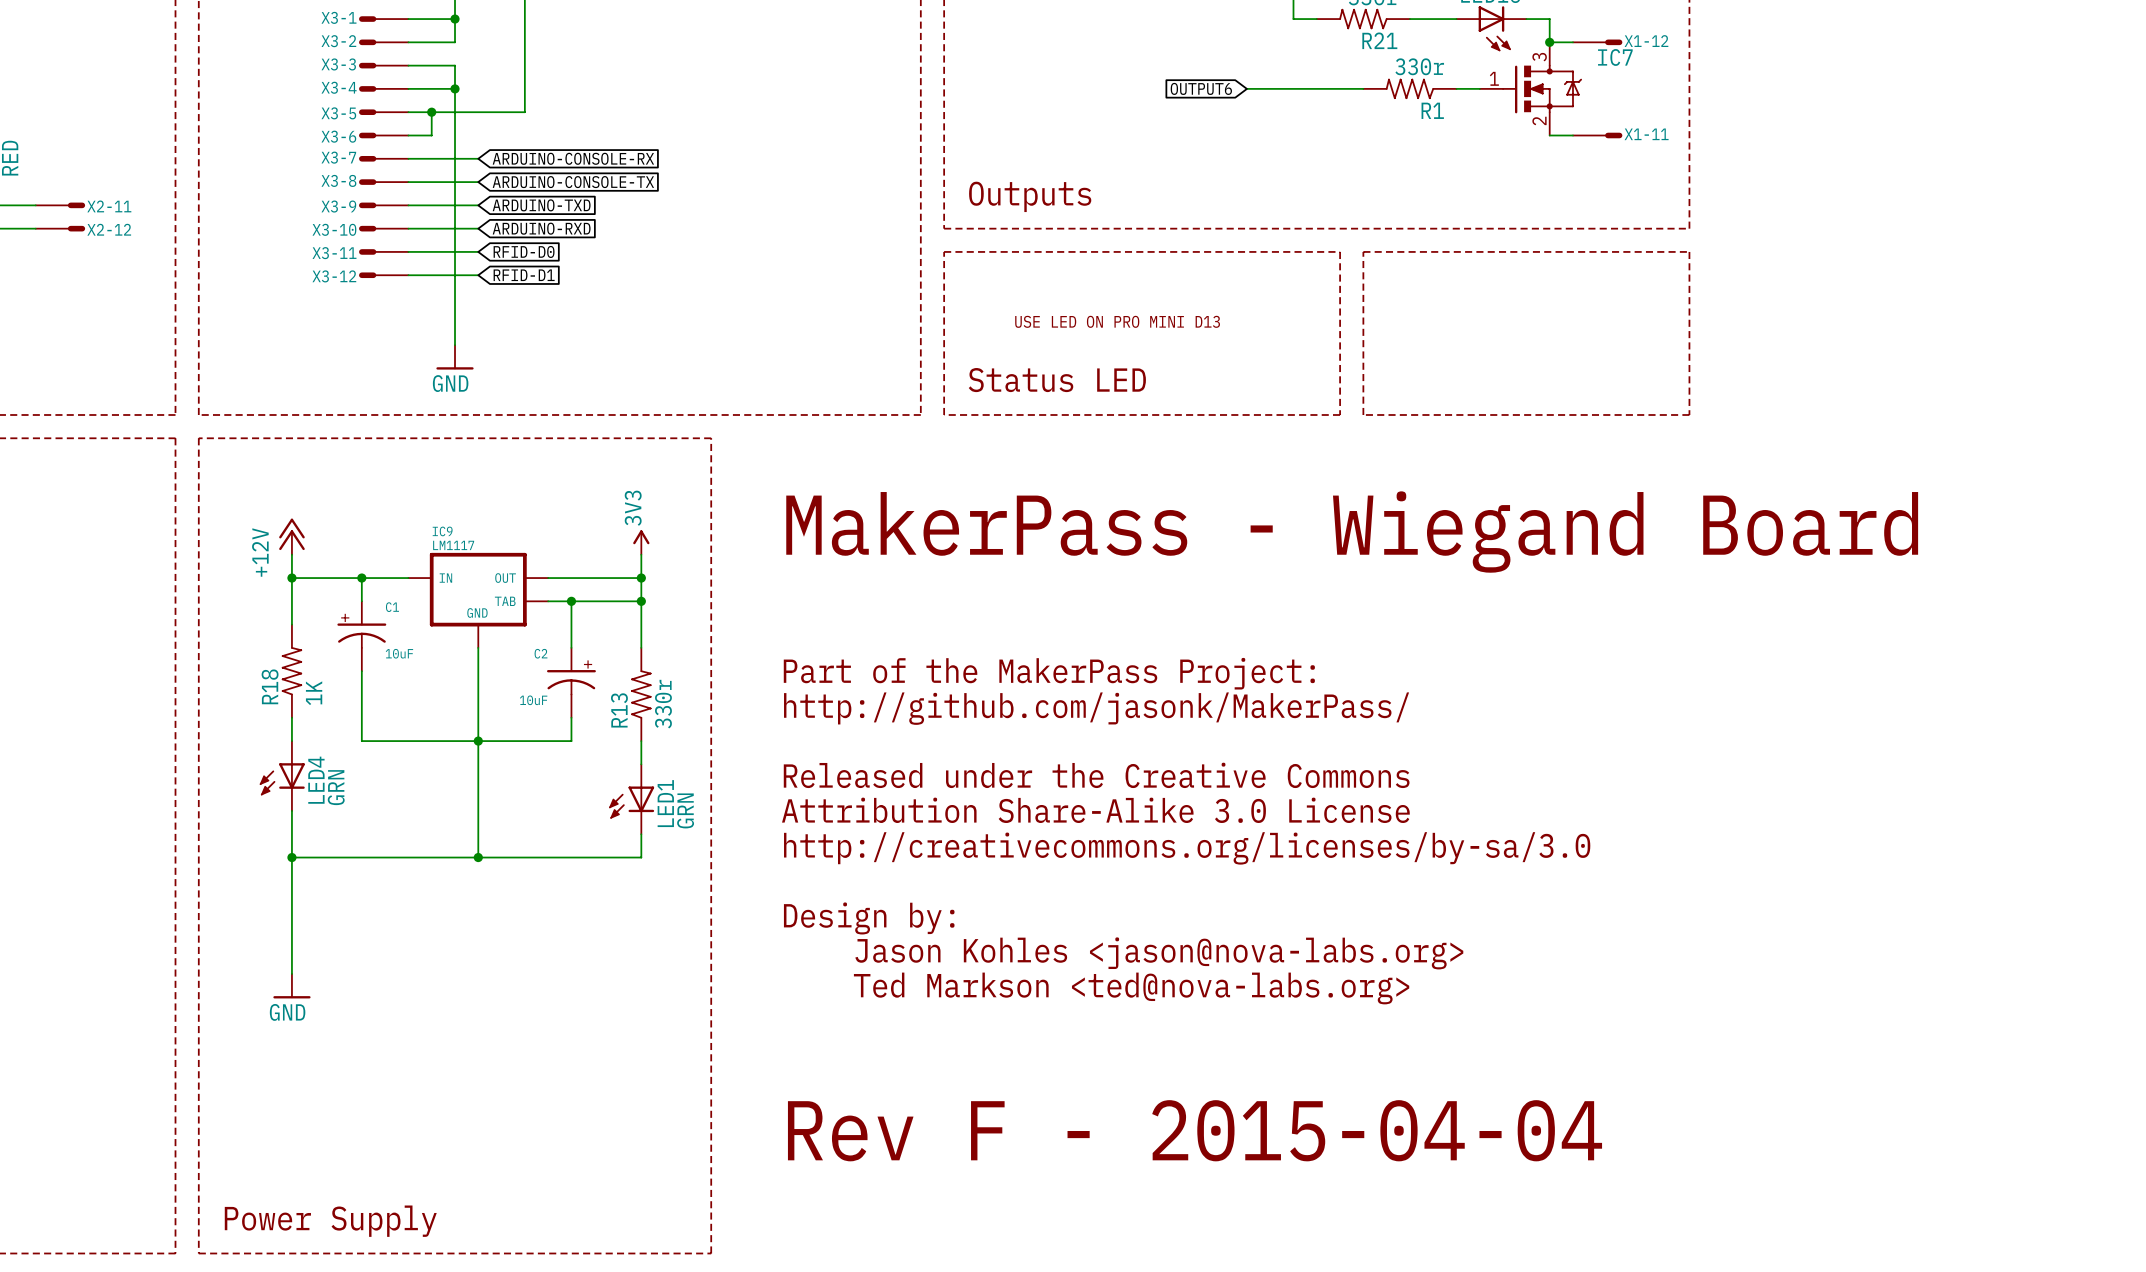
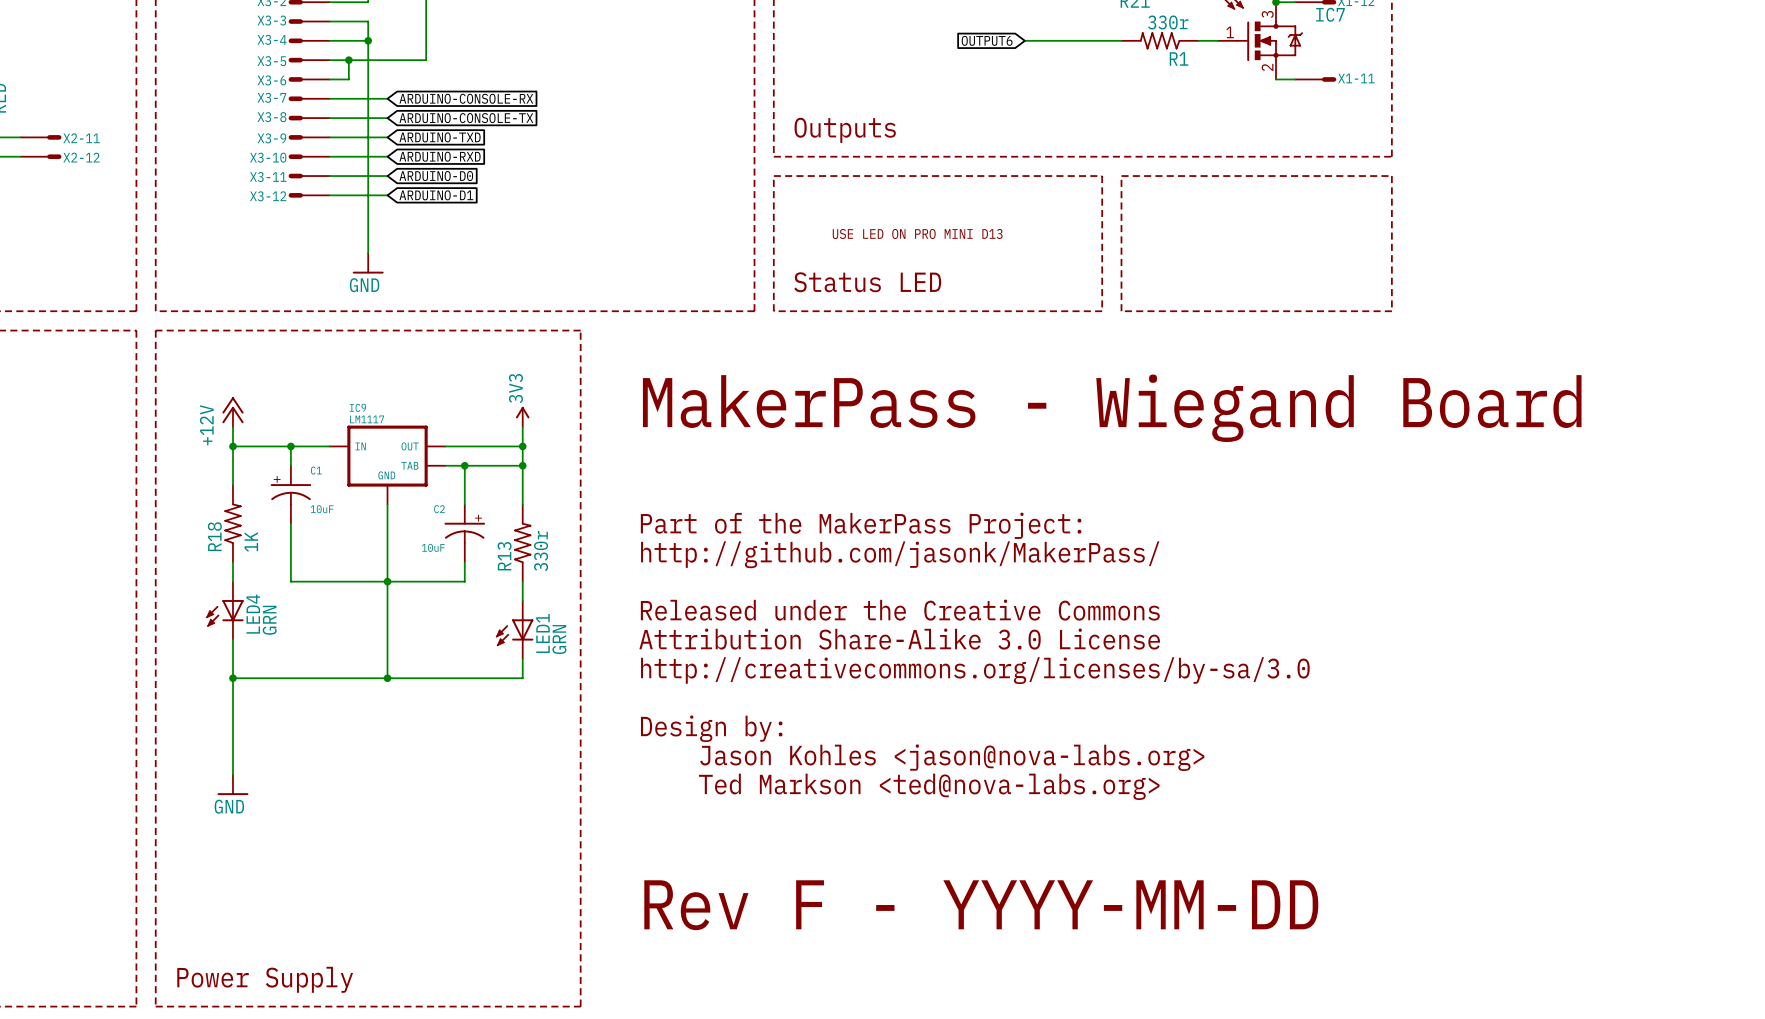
global label: RFID-D0 (524, 251) -> ARDUINO-D0 (436, 176)
global label: RFID-D1 (524, 275) -> ARDUINO-D1 (436, 195)
text: Rev F - 2015-04-04 (1195, 1130) -> Rev F - YYYY-MM-DD (981, 905)

